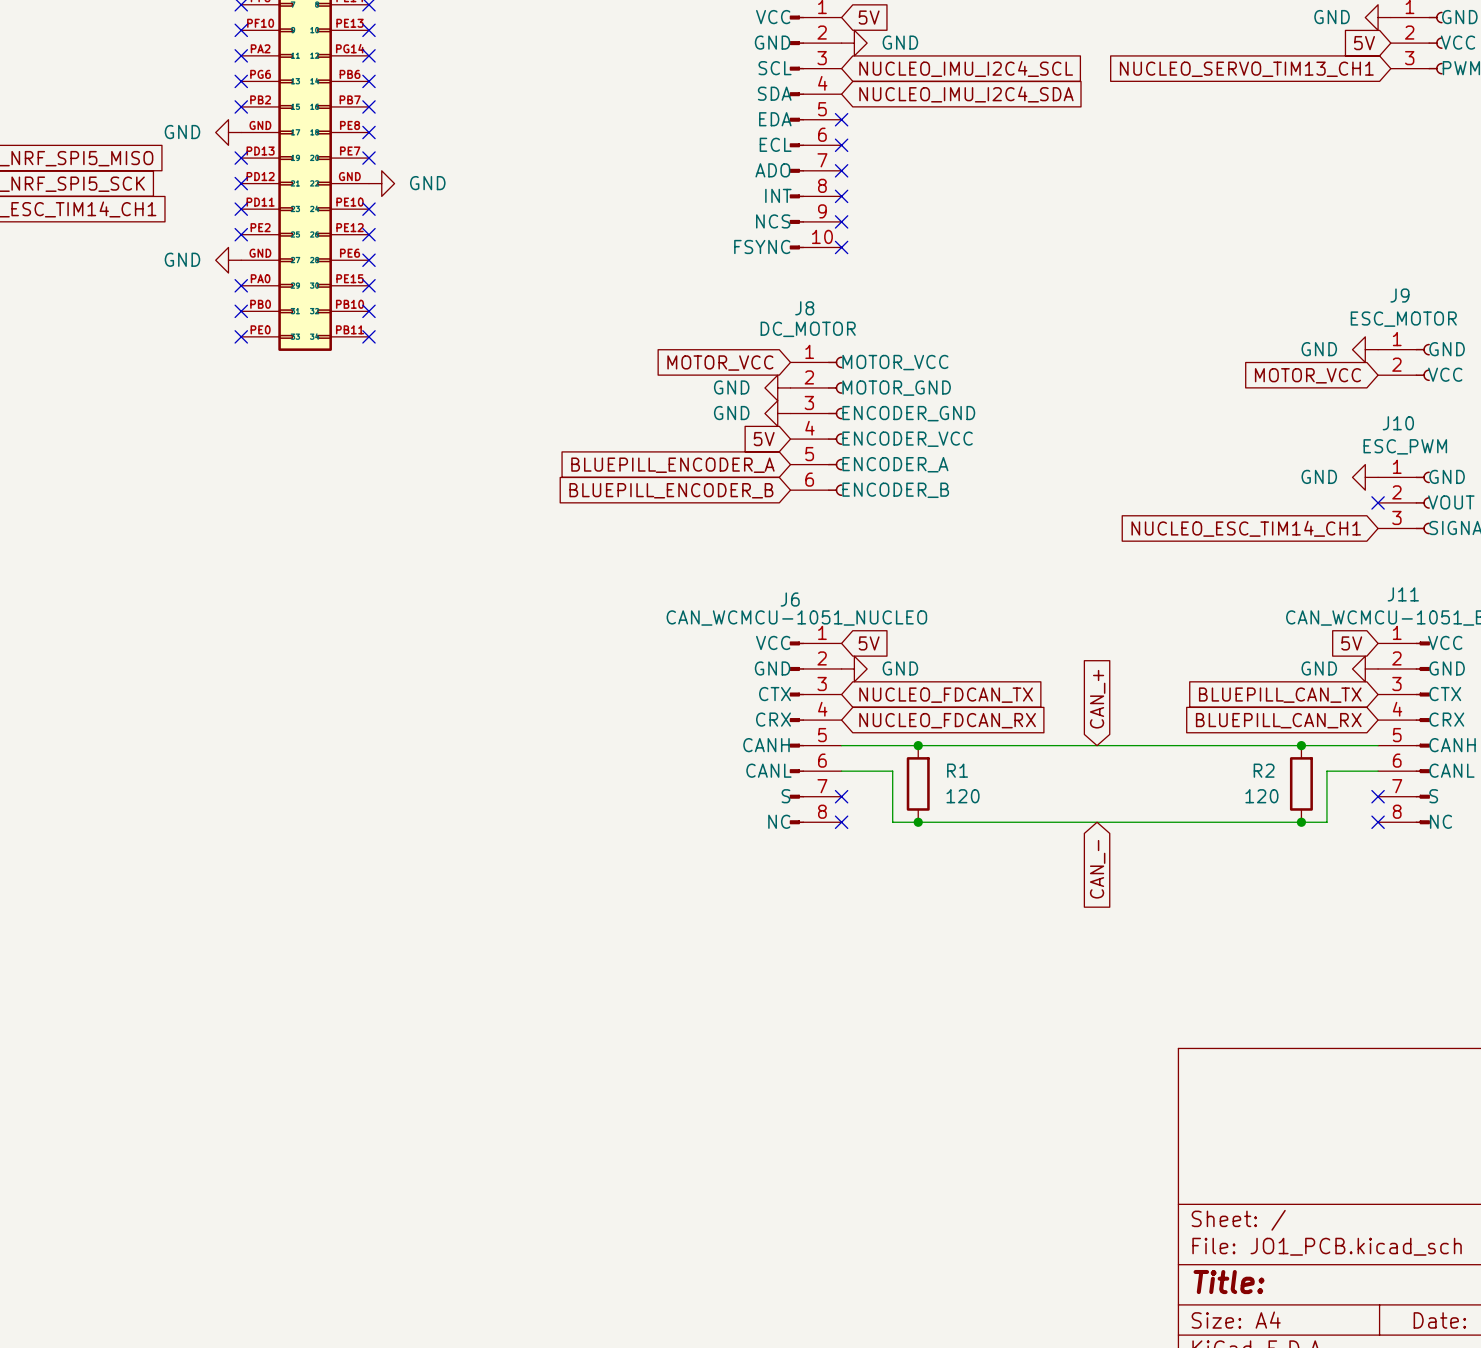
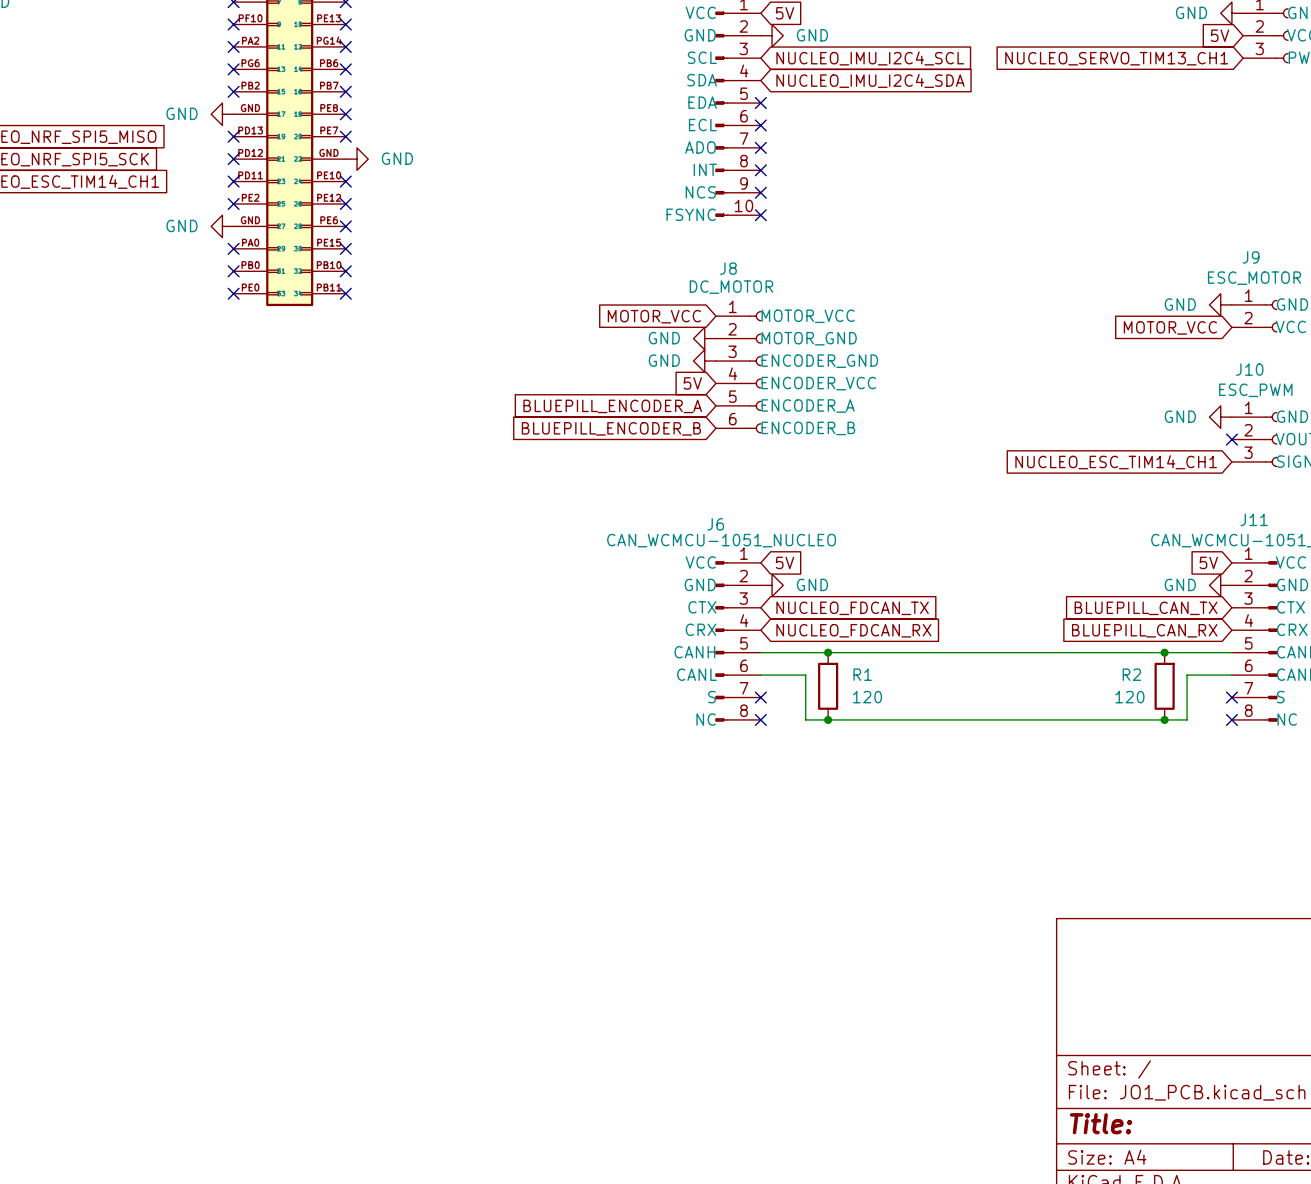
global label: CAN_+ (1097, 699) -> none
global label: CAN_- (1097, 869) -> none

